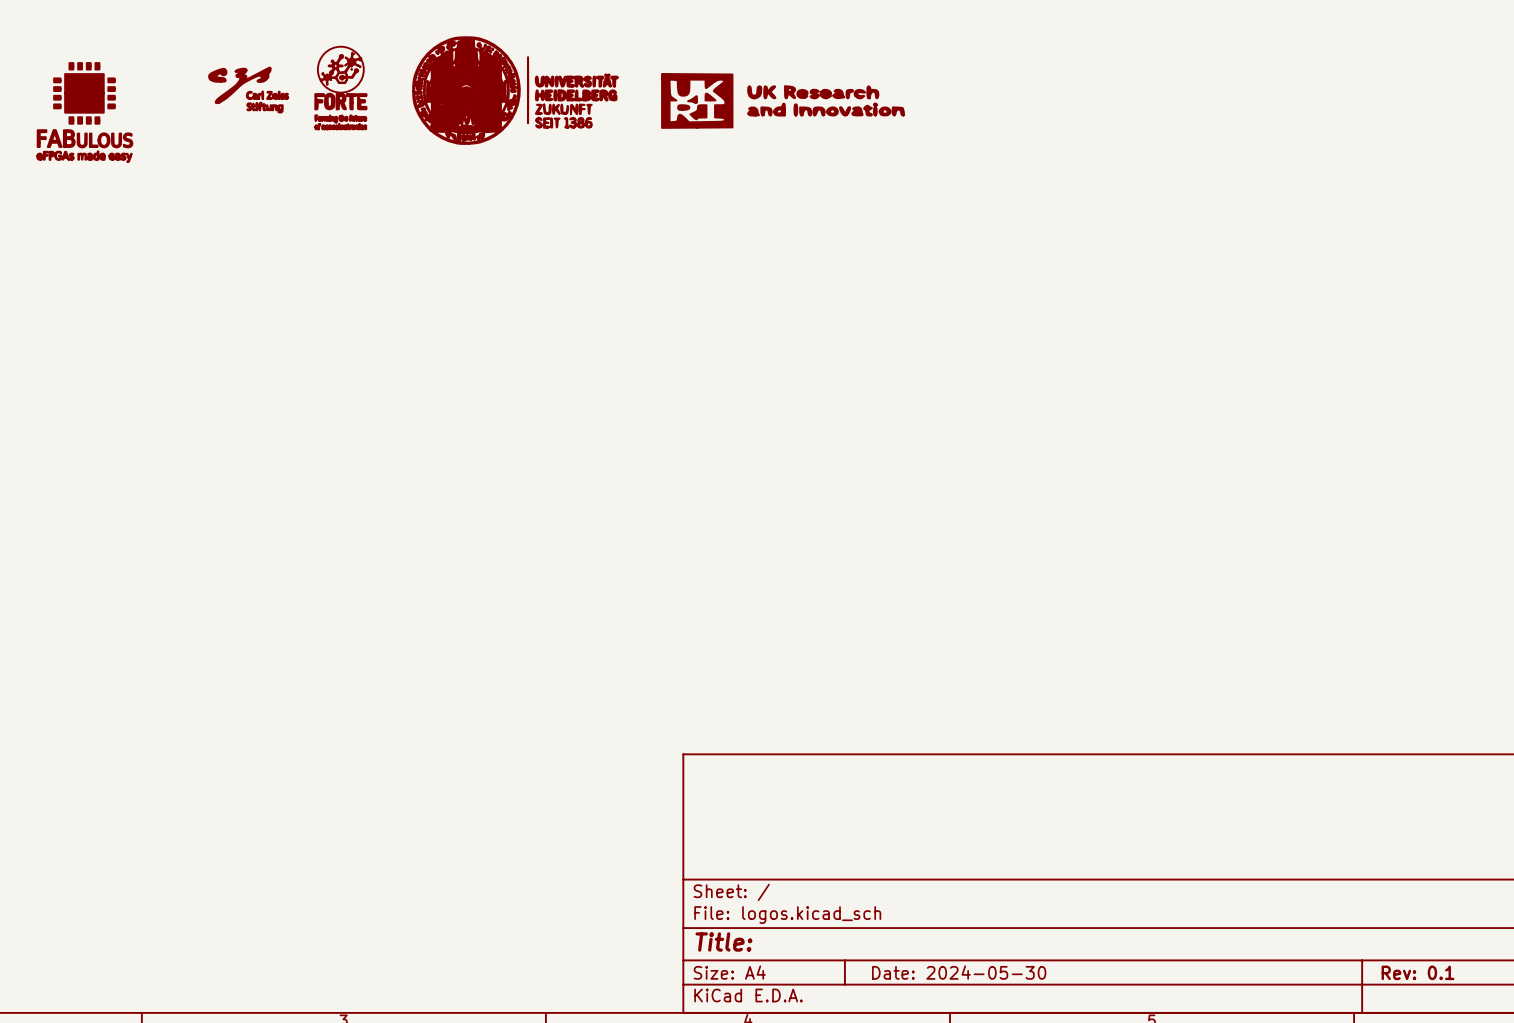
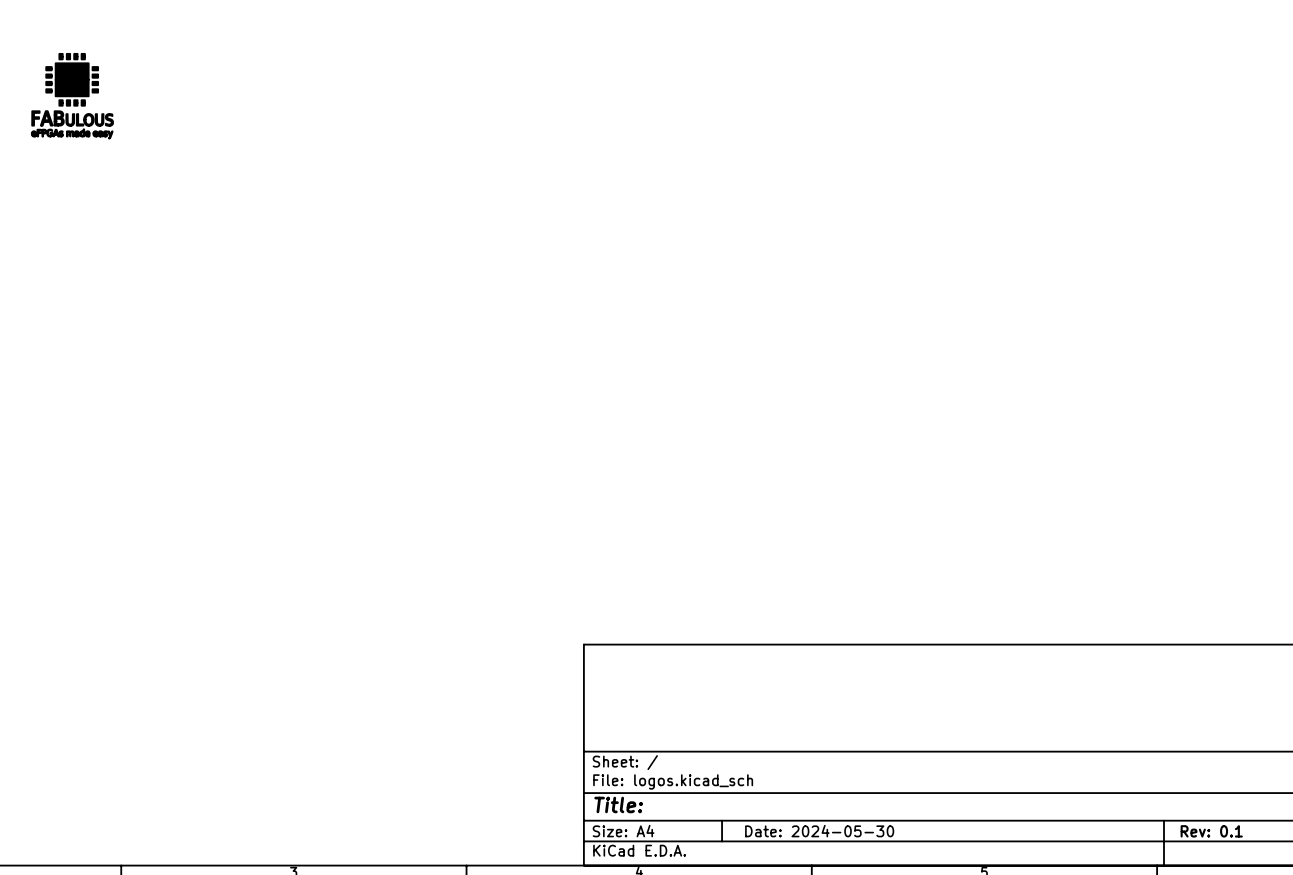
part: (340, 88) -> none
part: (248, 90) -> none
part: (515, 90) -> none
part: (783, 100) -> none

